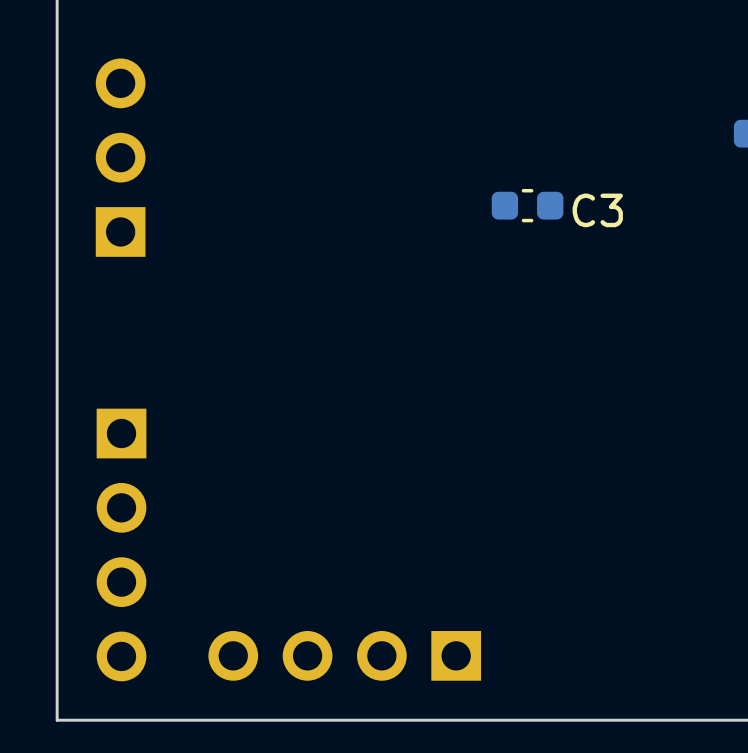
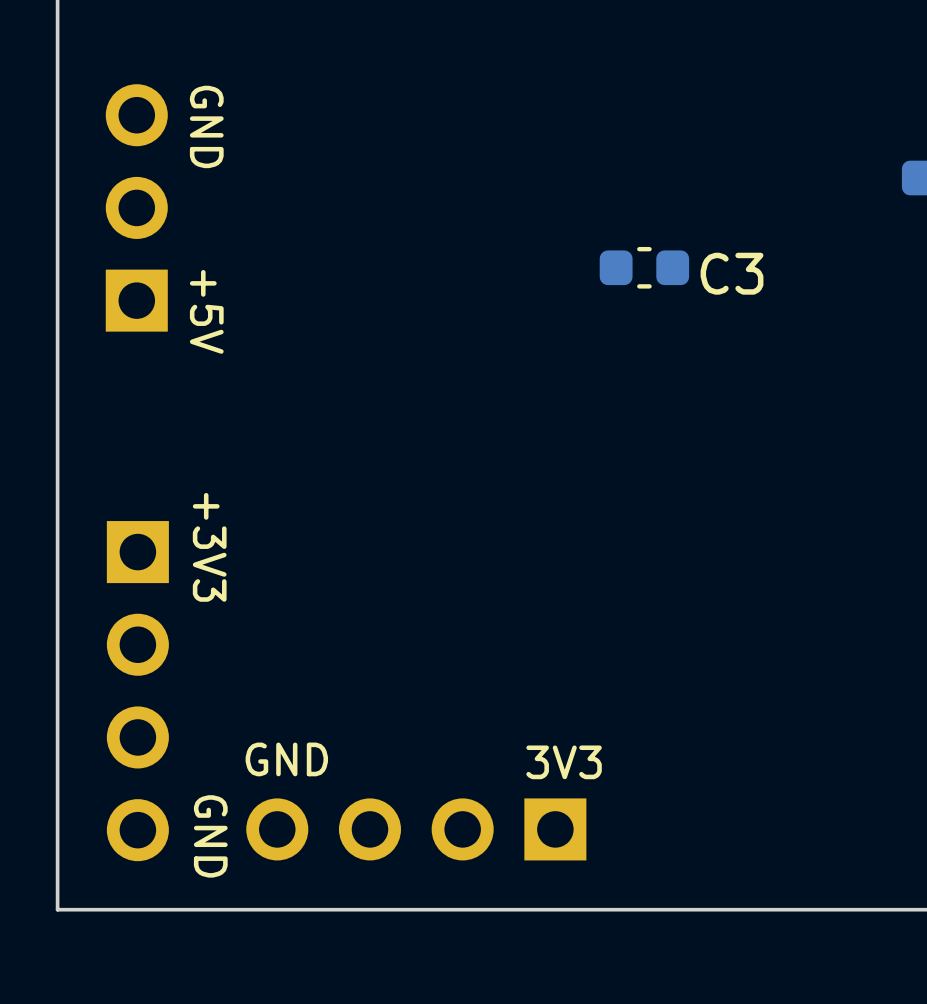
text: none -> GND (206, 126)
text: none -> +5V (206, 311)
text: none -> +3V3 (209, 547)
text: none -> GND (286, 759)
text: none -> 3V3 (564, 762)
text: none -> GND (210, 836)

